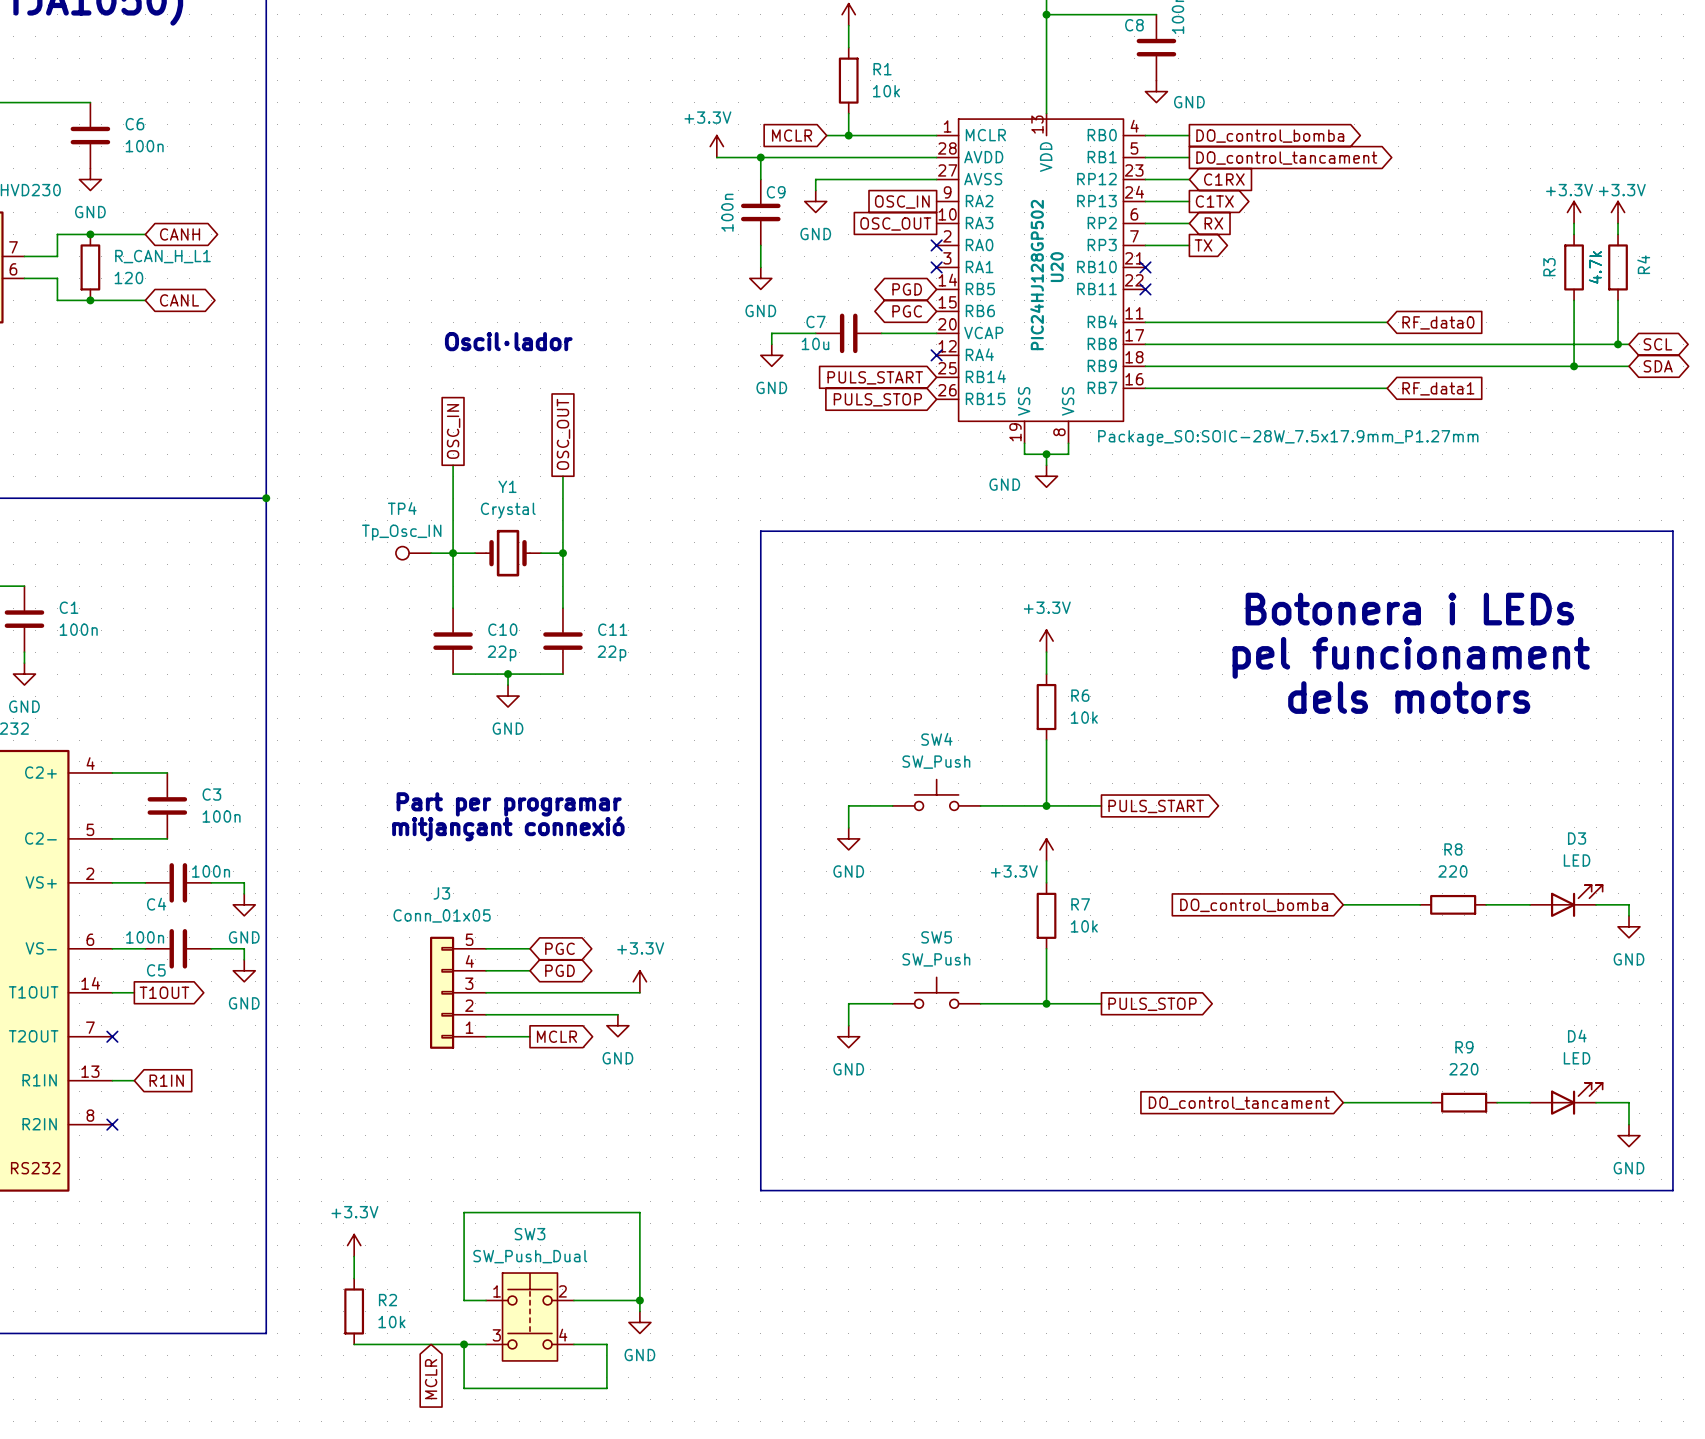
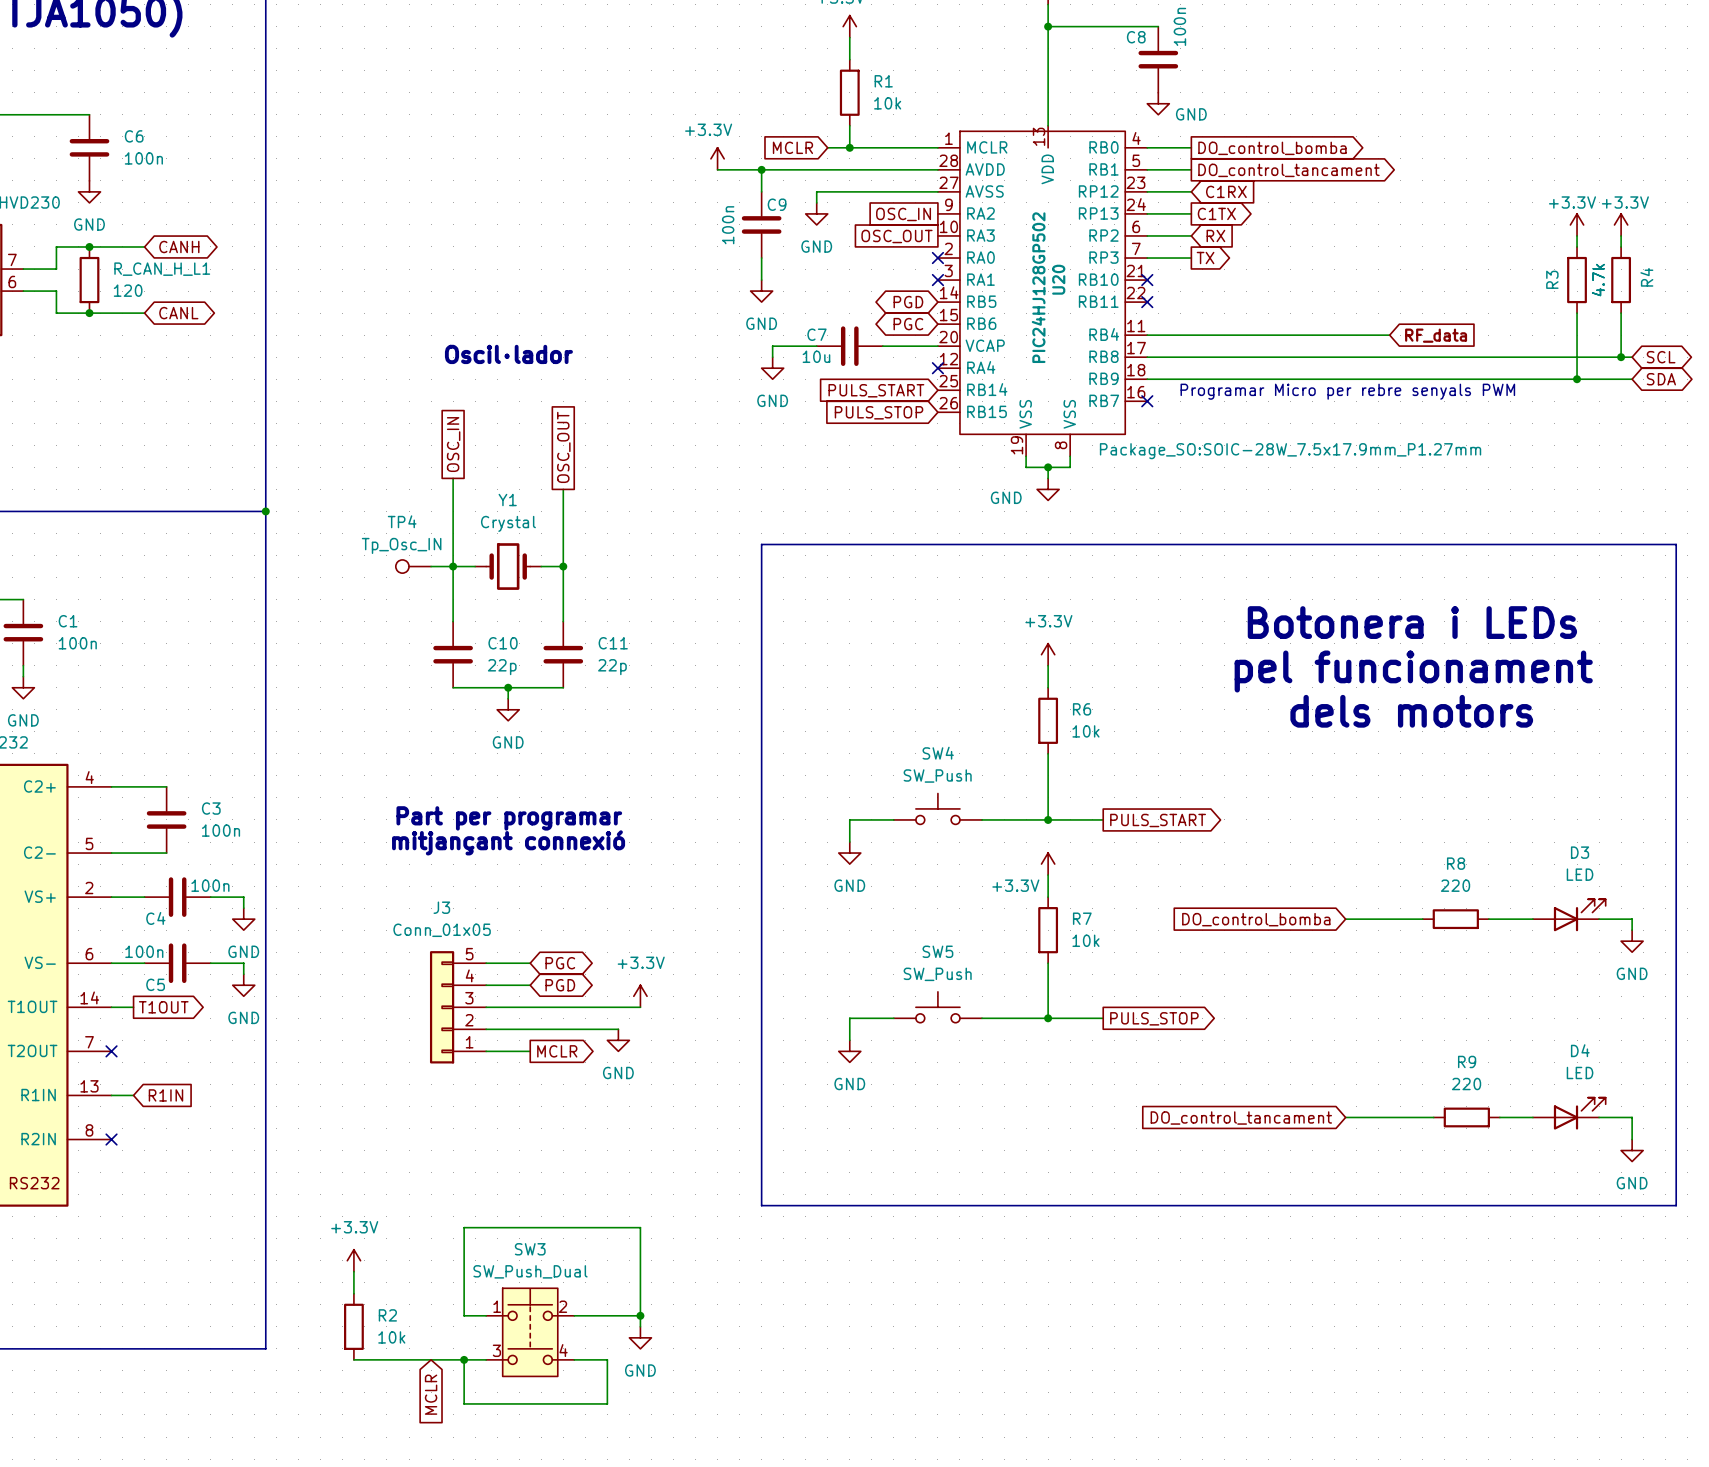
global label: RF_data0 (1438, 322) -> RF_data (1436, 335)
text: none -> Programar Micro per rebre senyals PWM (1347, 391)
wire: (1145, 388) (1387, 388) -> none
no-connect mark: none -> (1147, 401)
global label: RF_data1 (1438, 388) -> none

